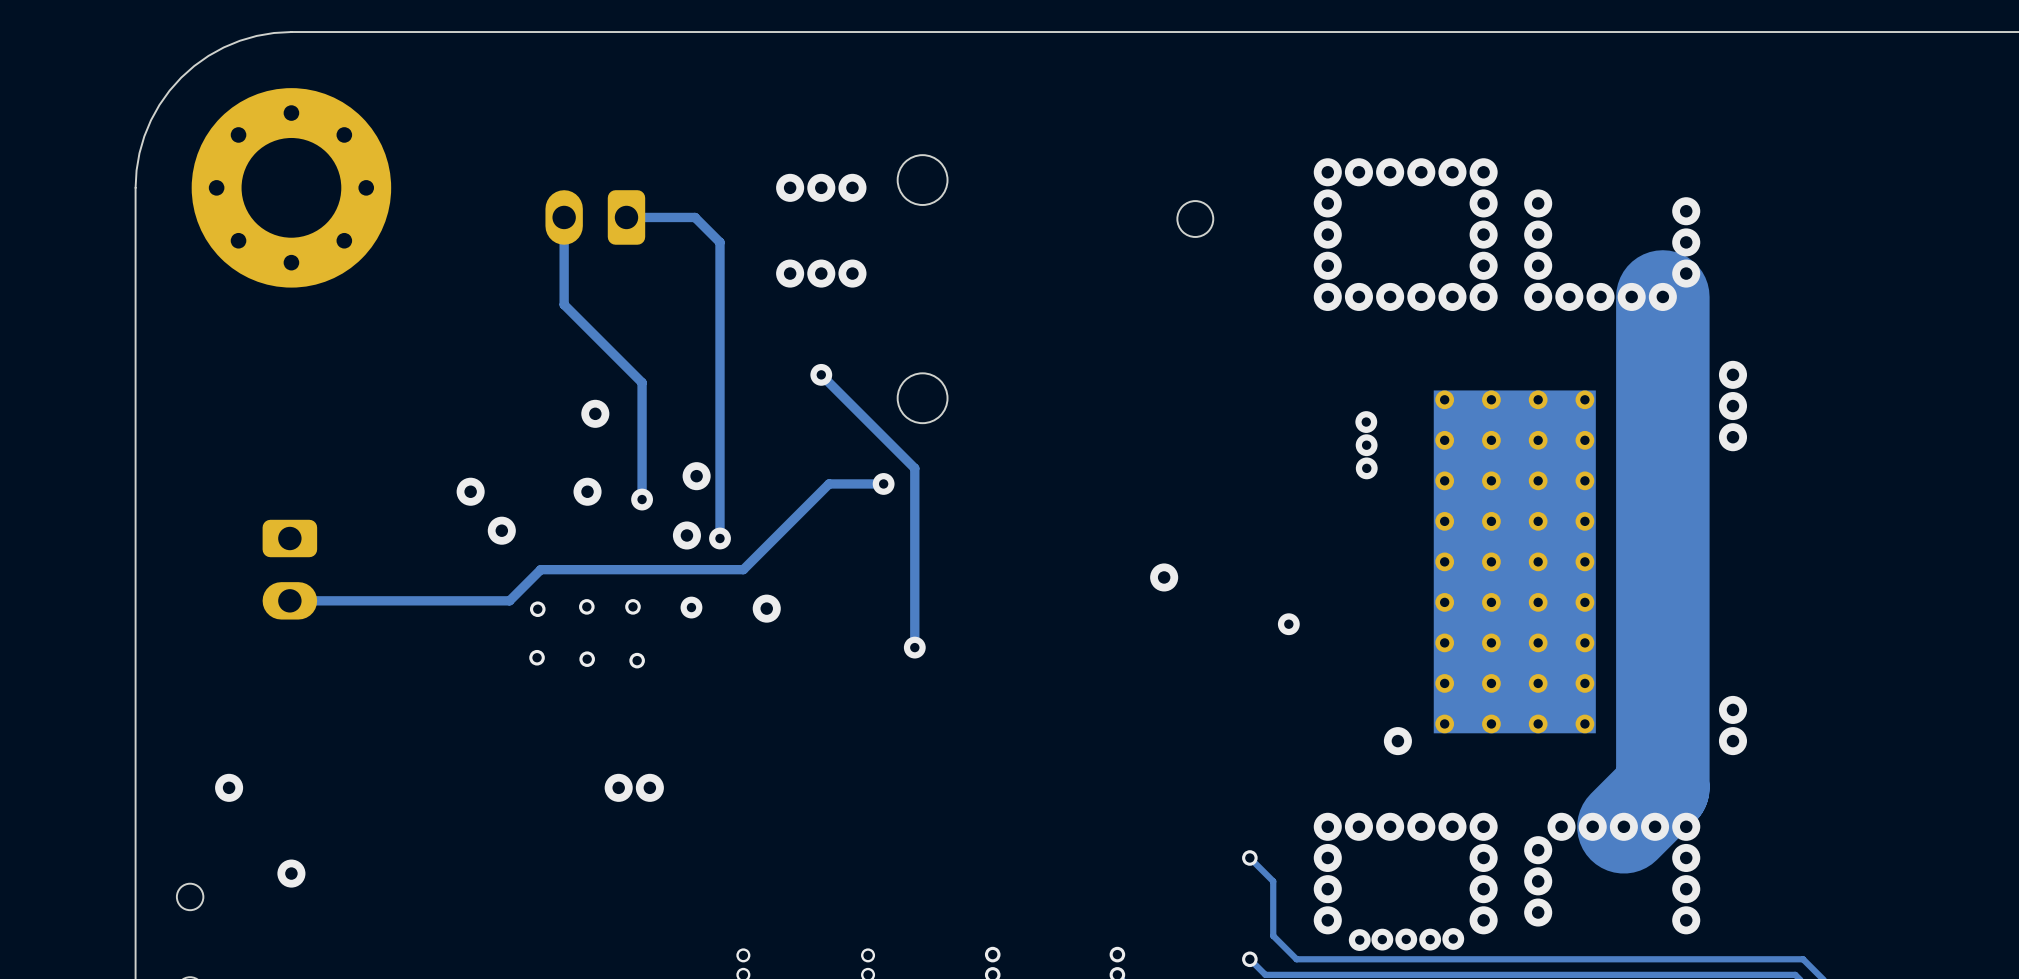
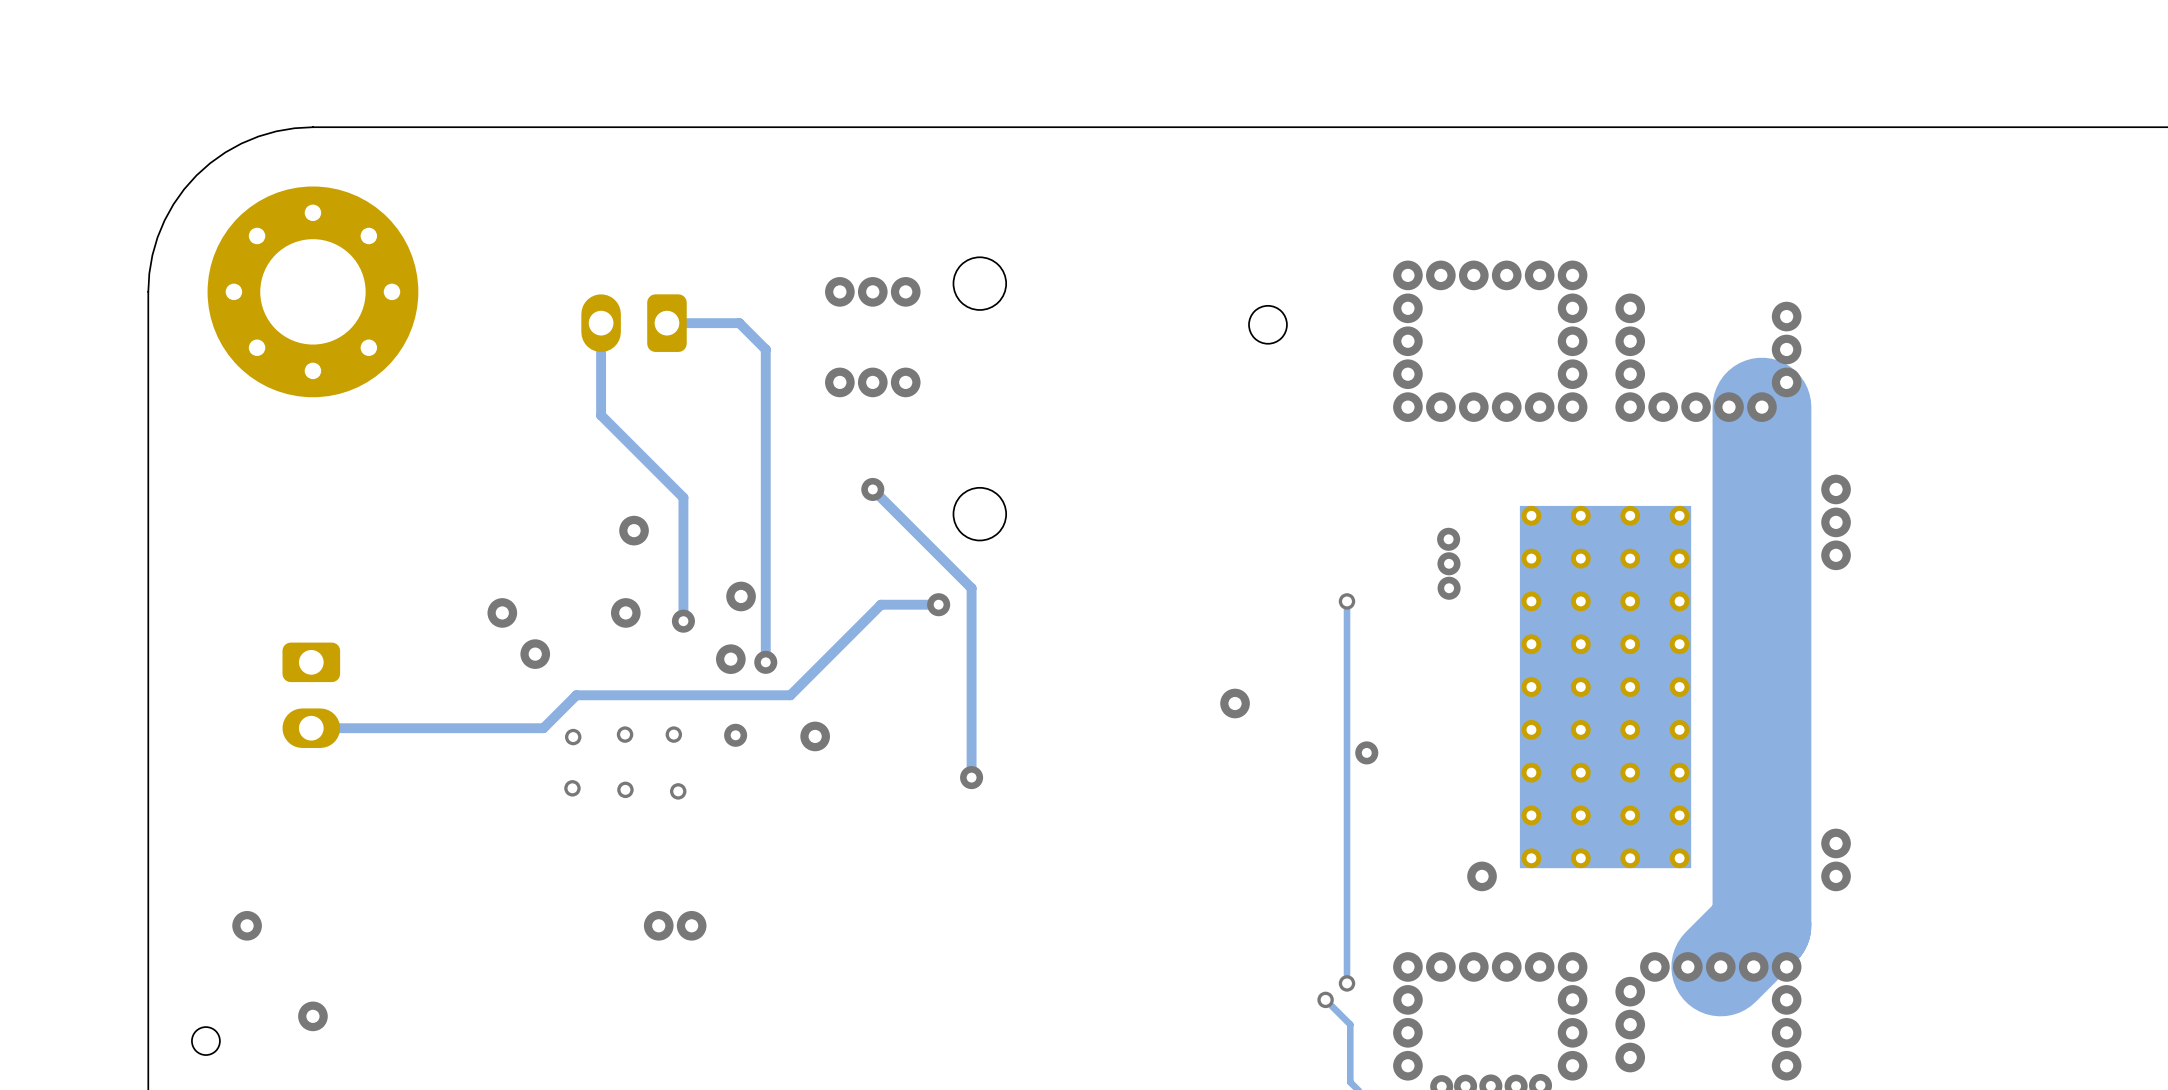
track: none -> (1347, 601) (1347, 983)
via: none -> (1347, 601)
via: none -> (1347, 983)

